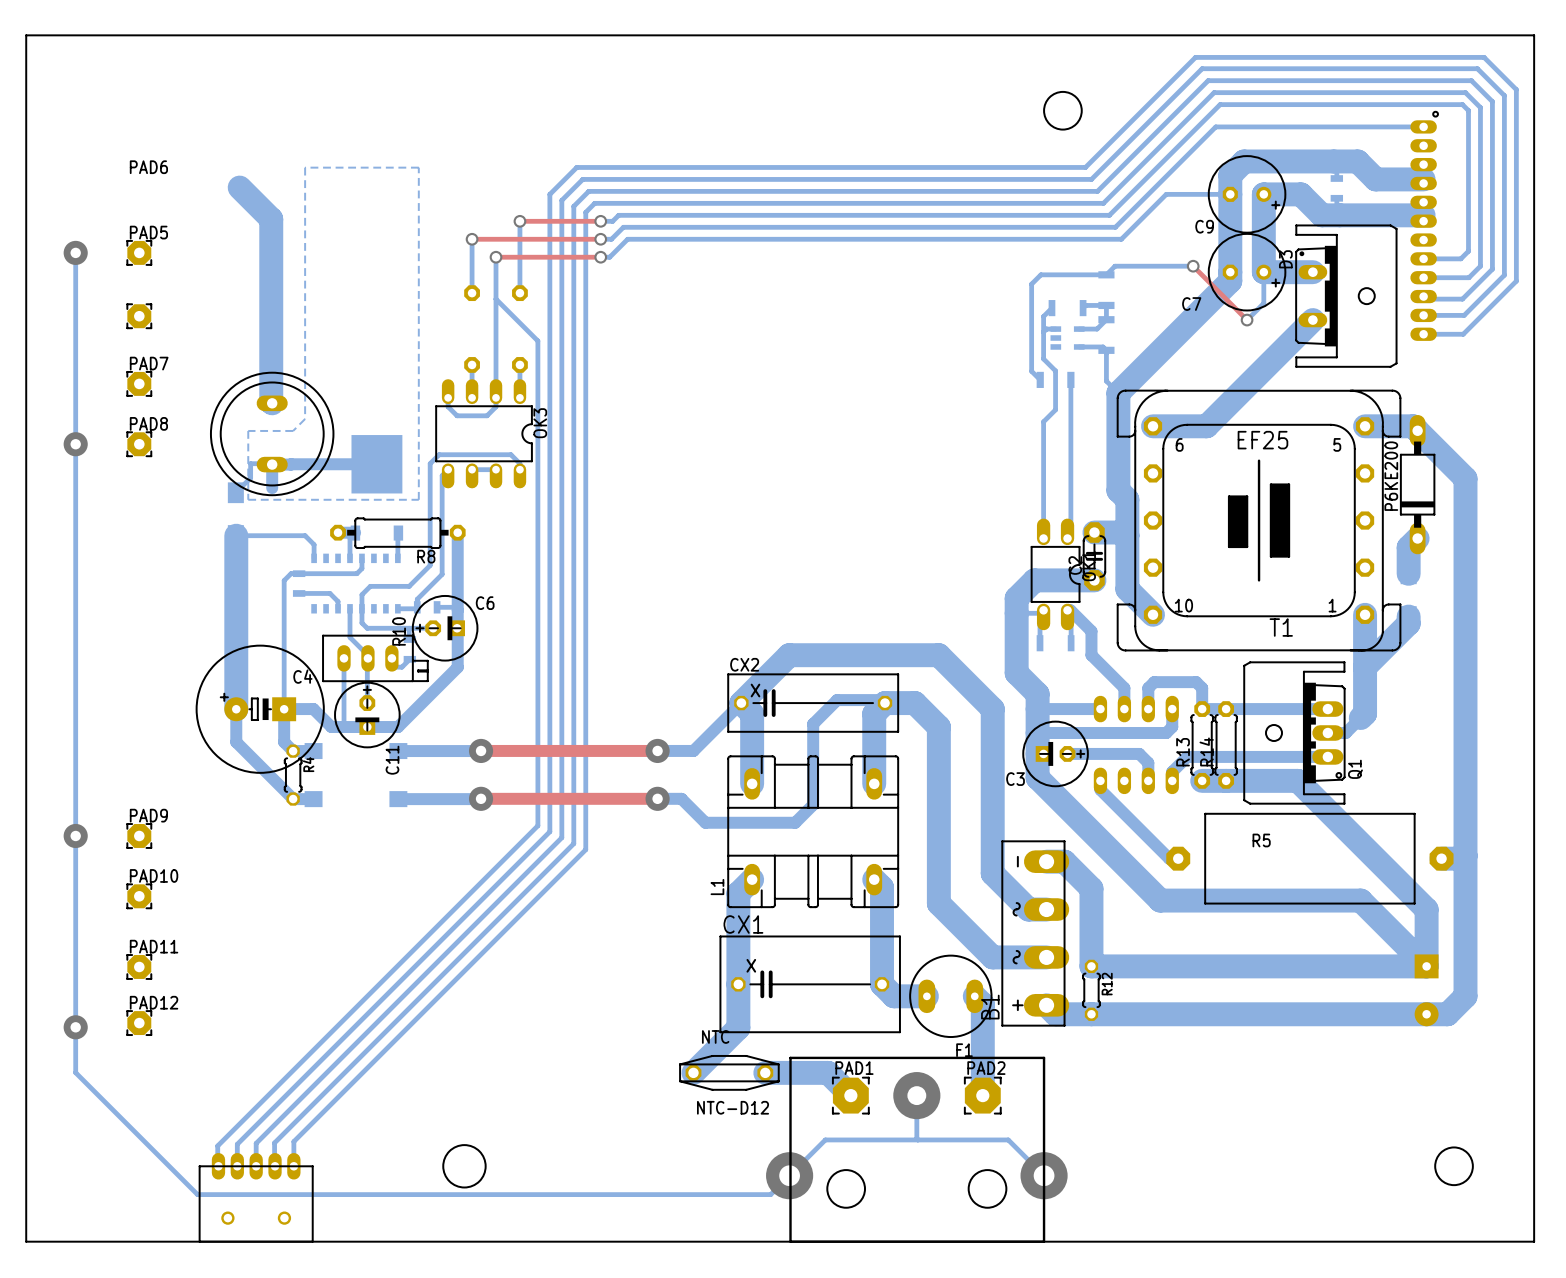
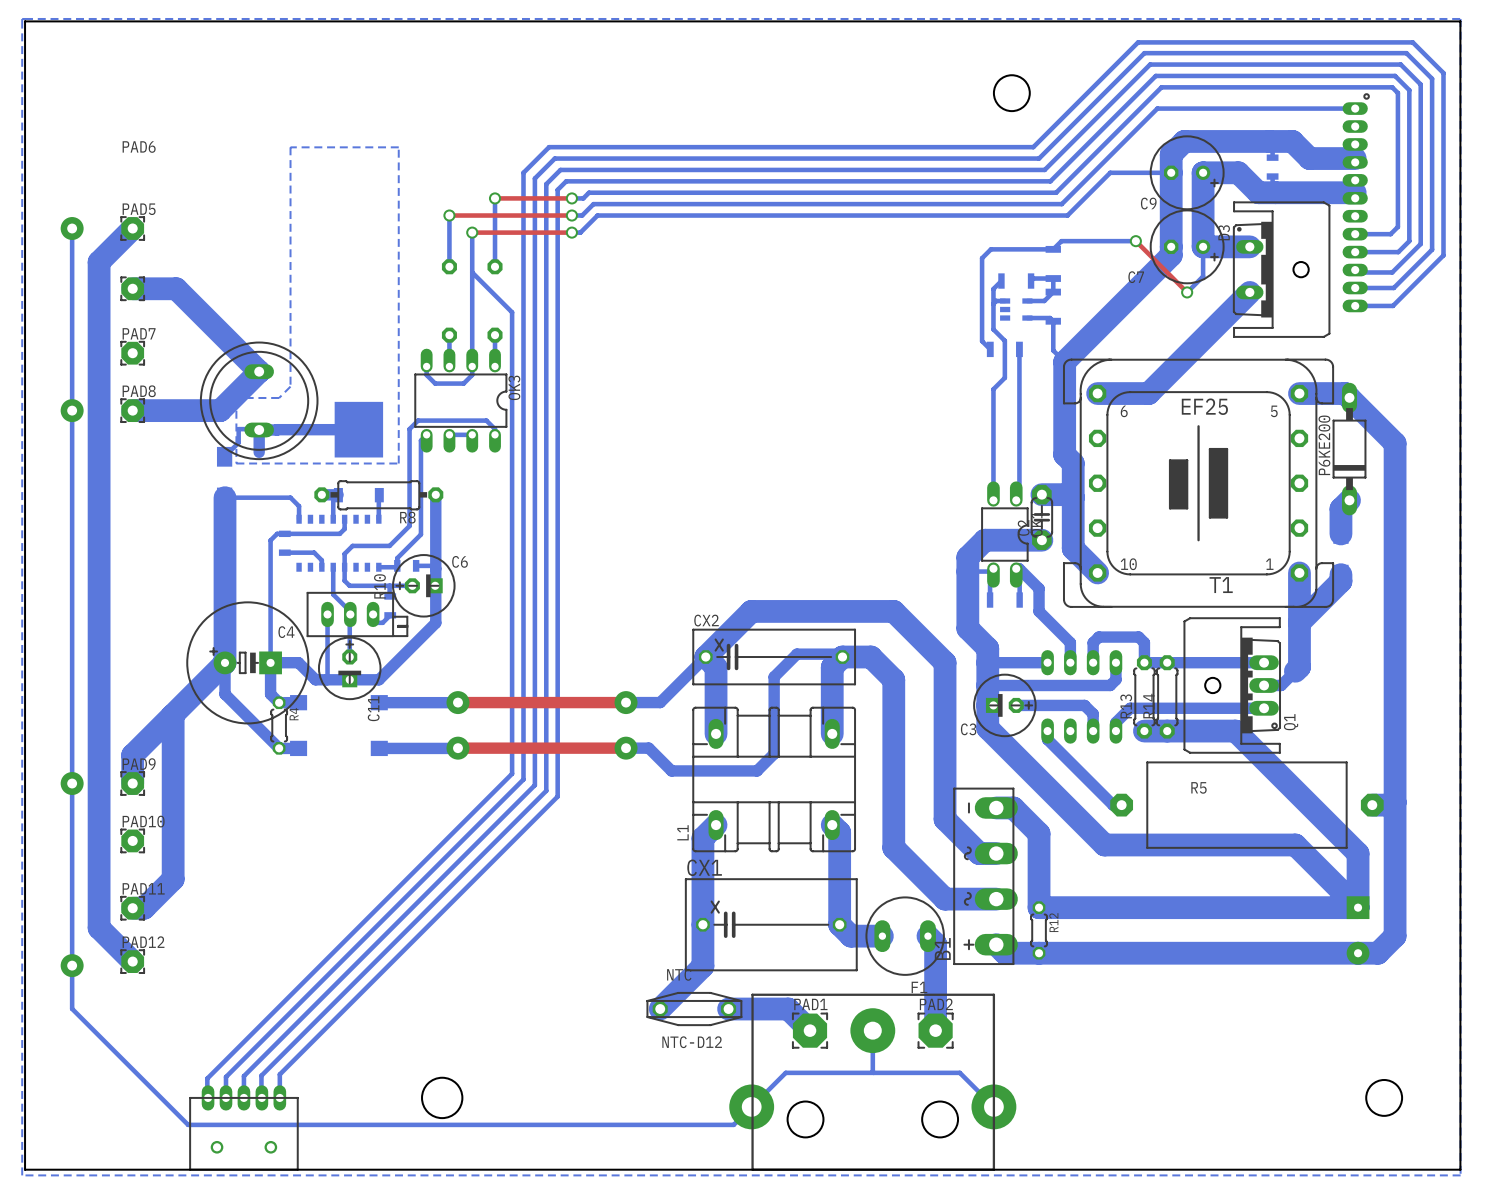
bottom zone outline: none -> (22, 18) (1460, 18) (1460, 1175) (22, 1175) (22, 18)
bottom track: (239, 187) (271, 219) (271, 402) -> (132, 288) (176, 288) (258, 370)
bottom track: none -> (132, 228) (99, 262) (99, 928) (132, 961)
bottom track: none -> (259, 371) (220, 410) (132, 410)
bottom track: none -> (225, 662) (132, 755) (132, 783)
bottom track: none -> (172, 715) (173, 879) (144, 908) (132, 908)

